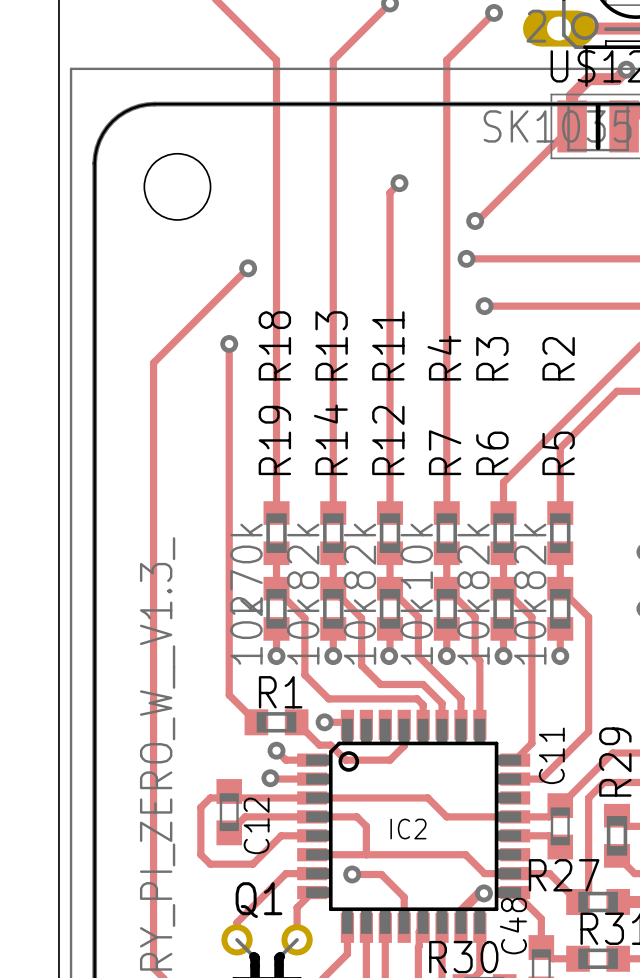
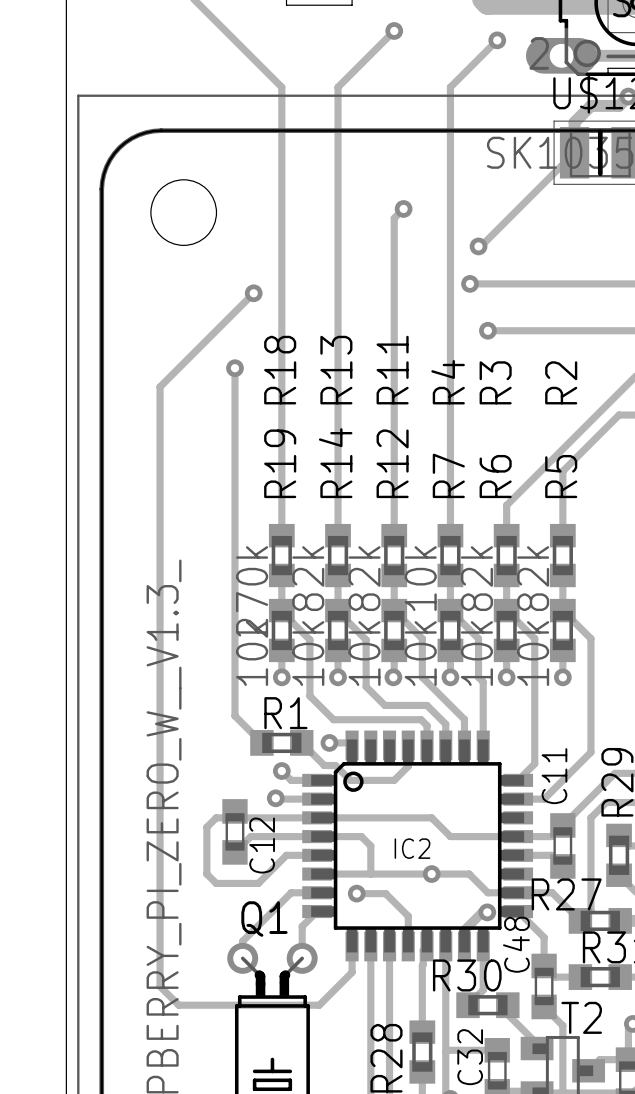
via: none -> (431, 874)

